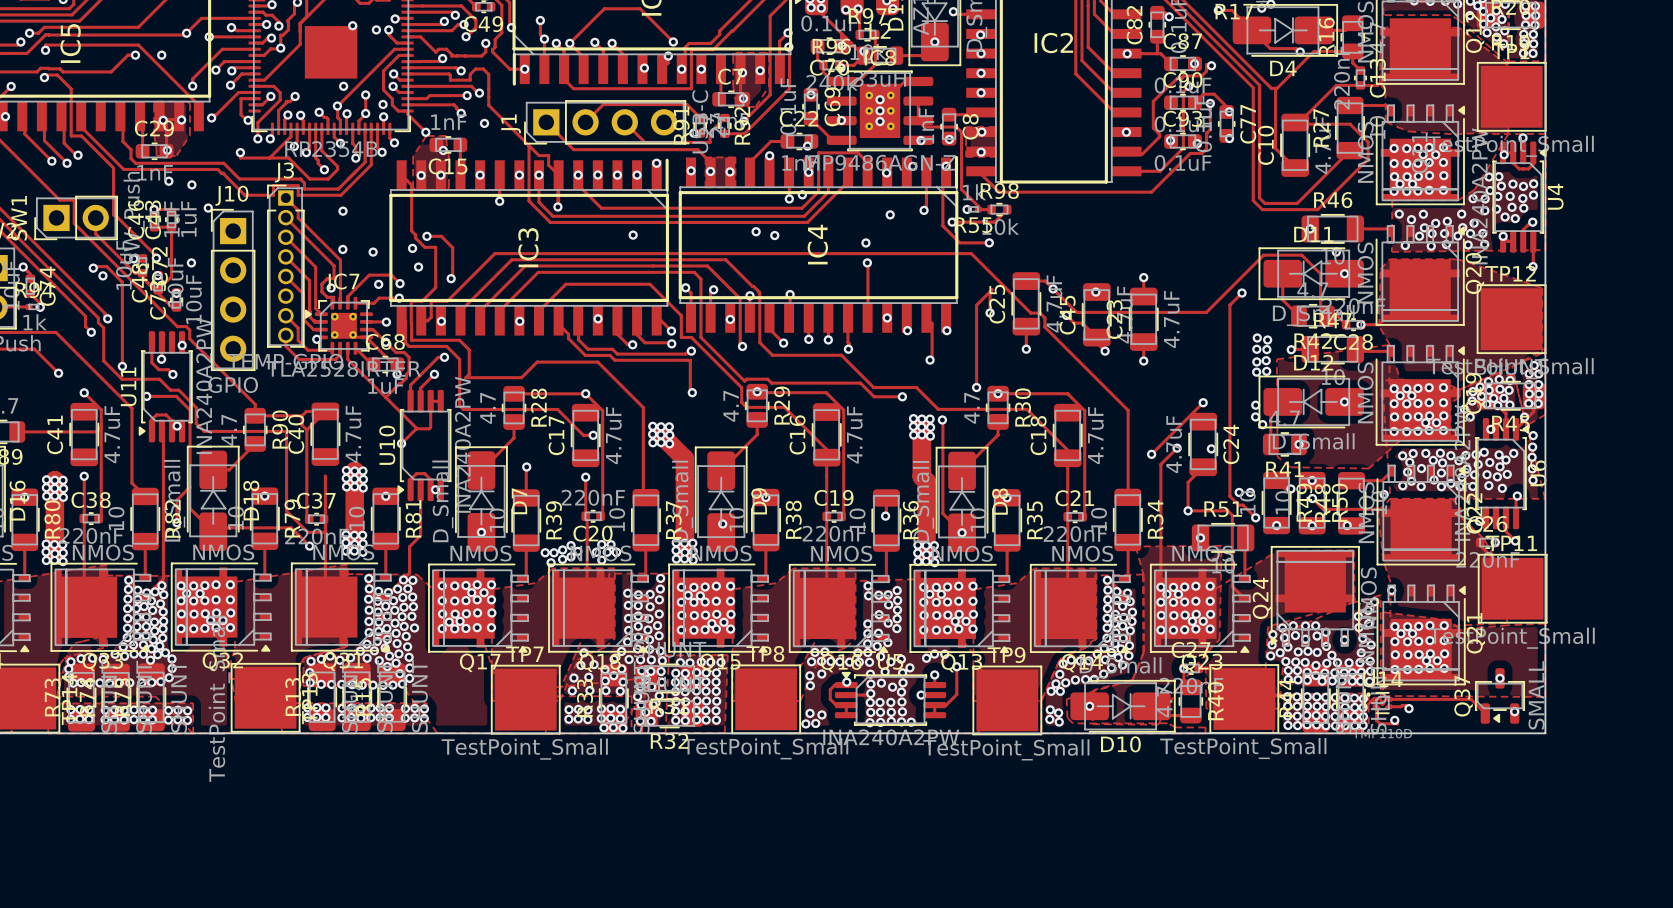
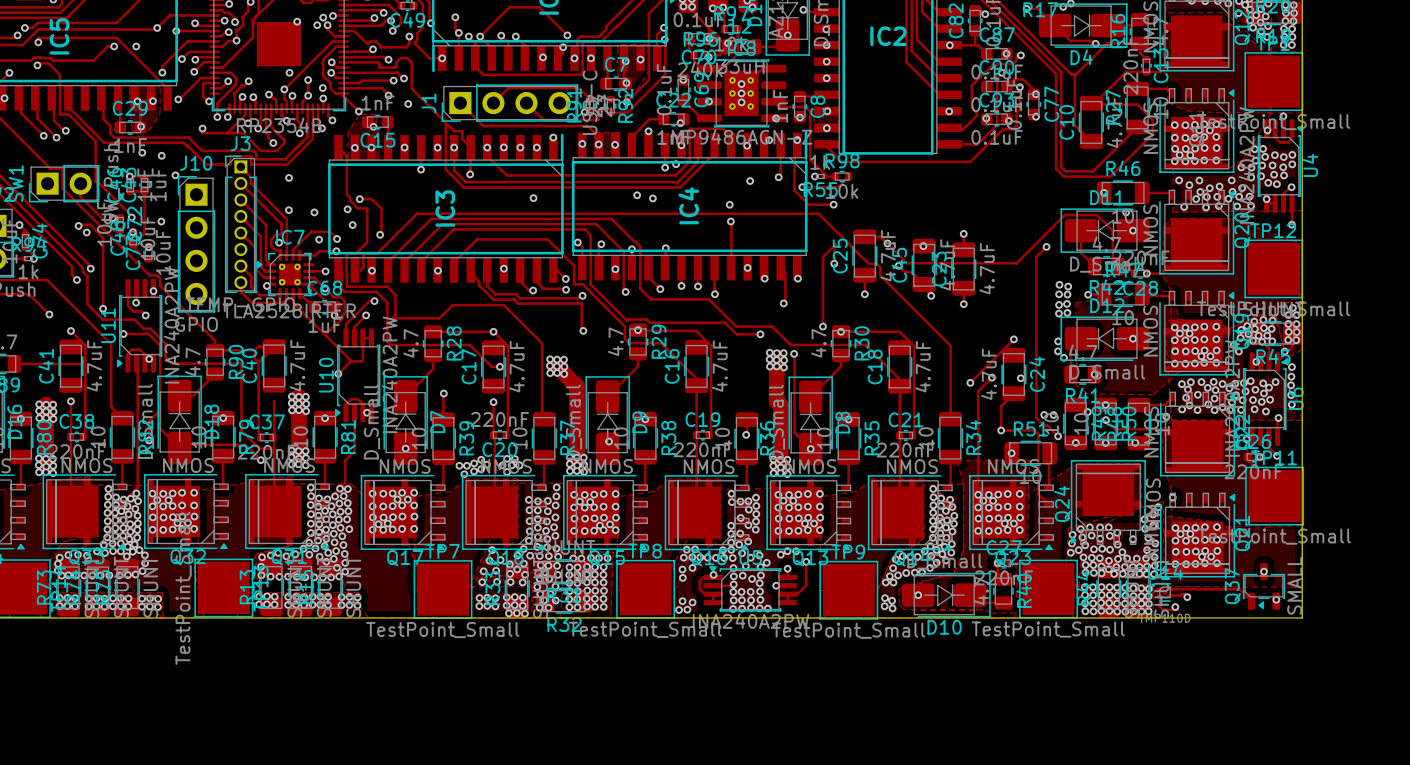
via: none -> (323, 17)

